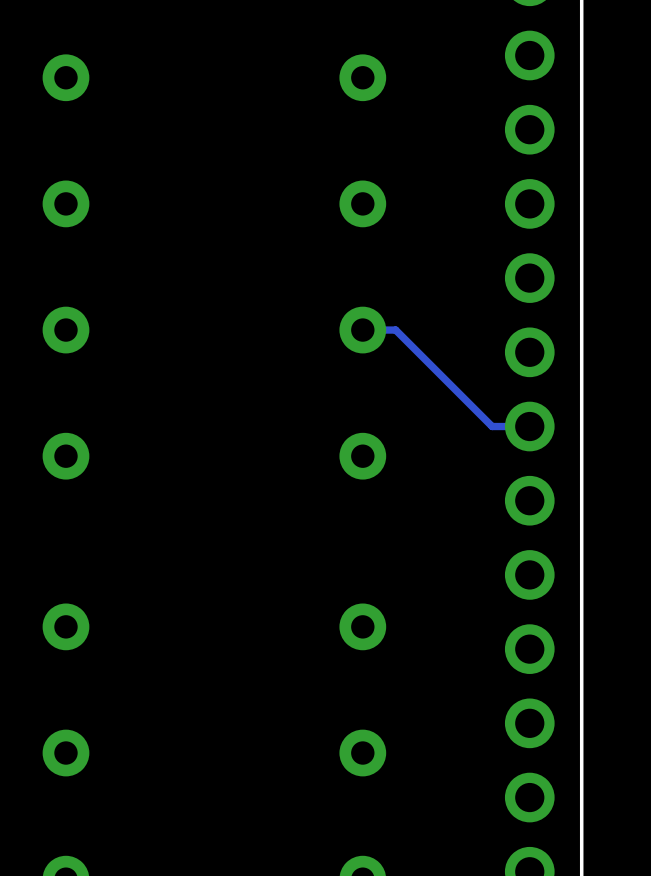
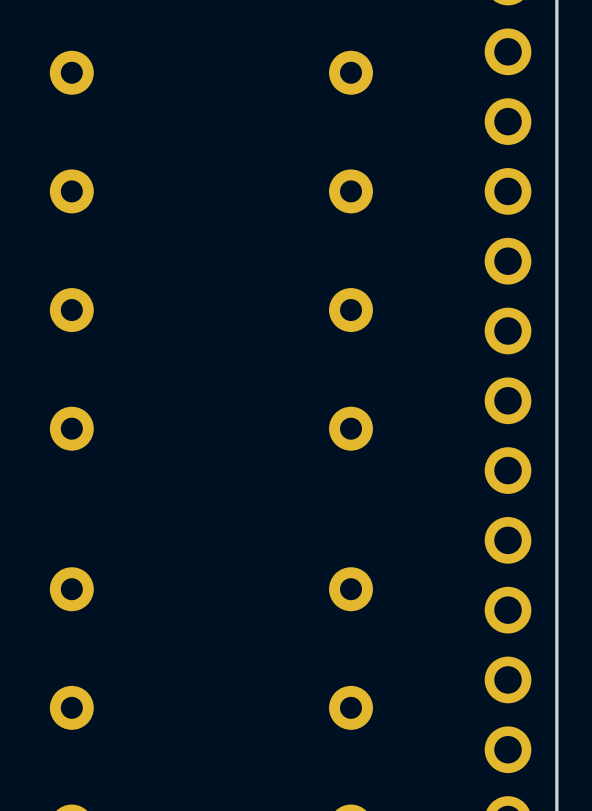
track: (362, 330) (395, 330) (492, 426) (529, 426) -> none

